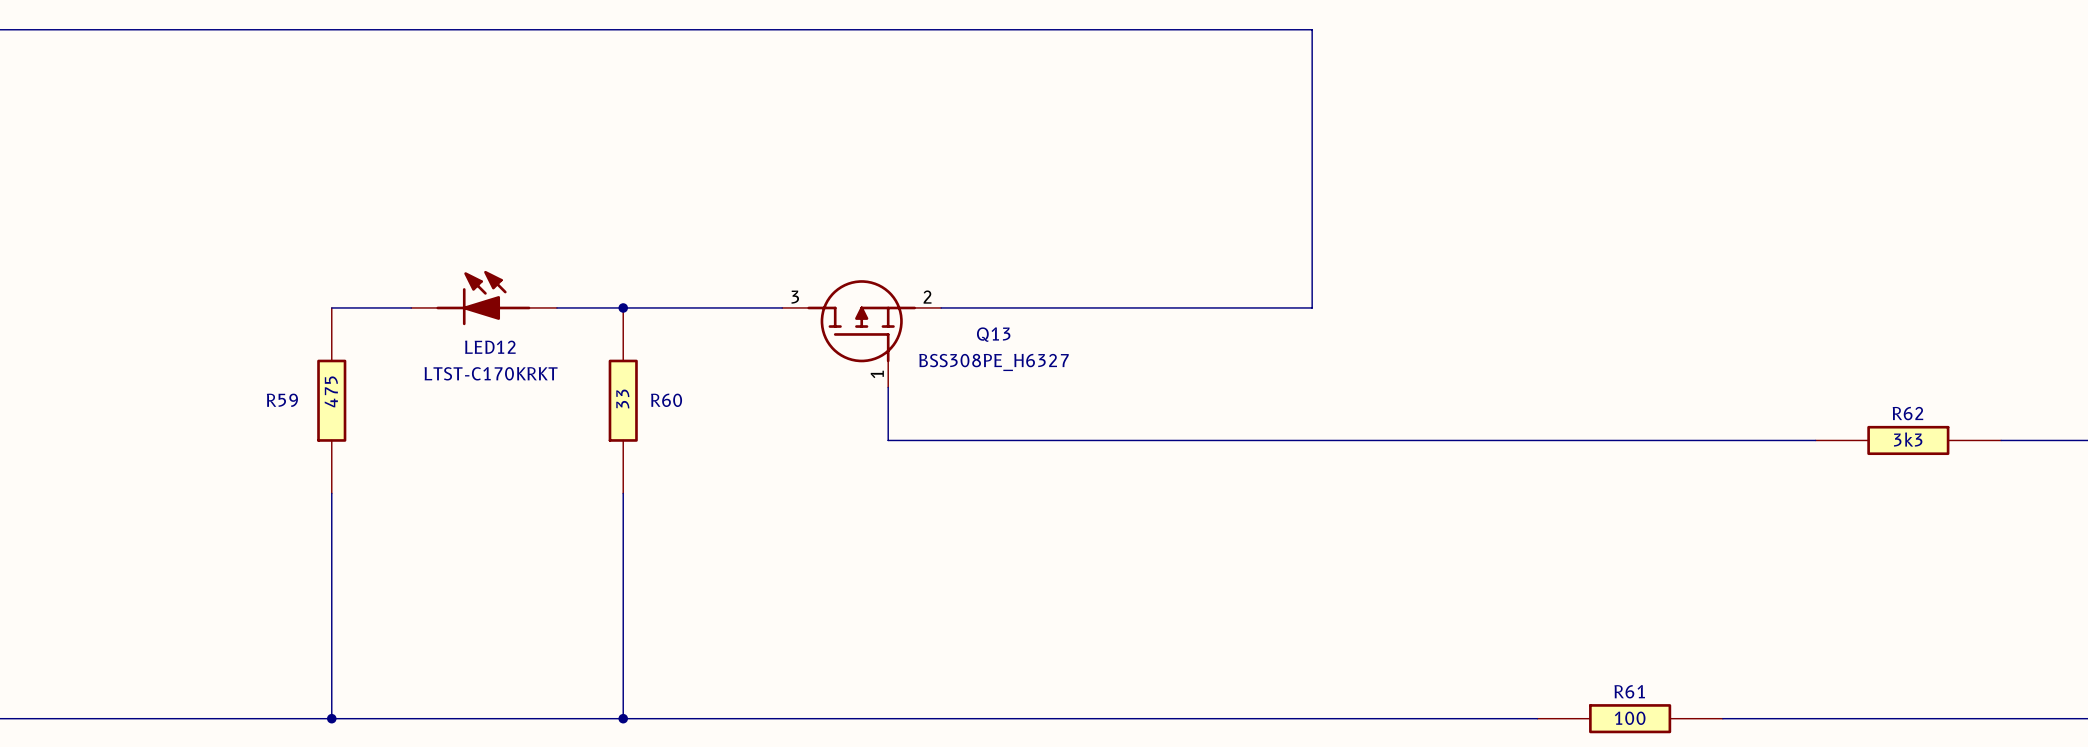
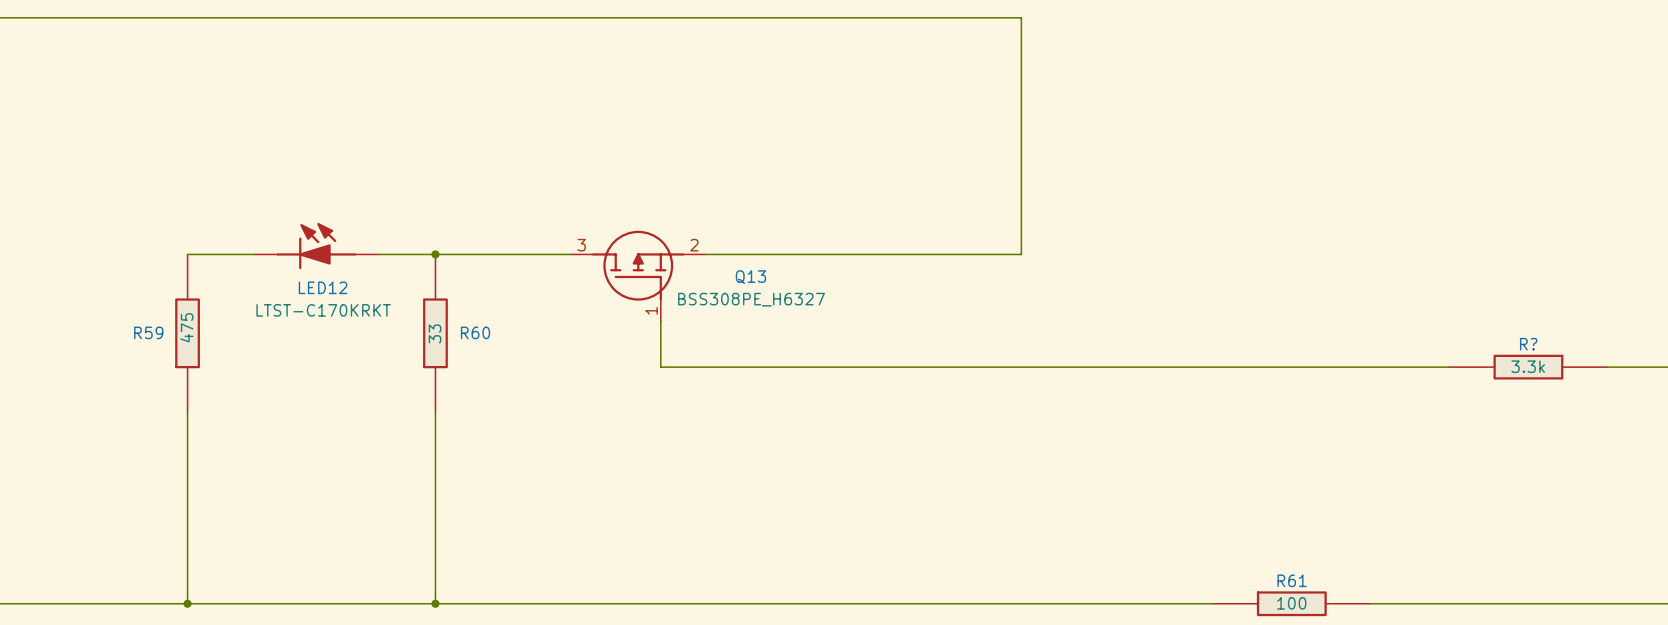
R62 name: R62 (1907, 413) -> R? (1528, 344)
R62 value: 3k3 (1908, 439) -> 3.3k (1528, 366)

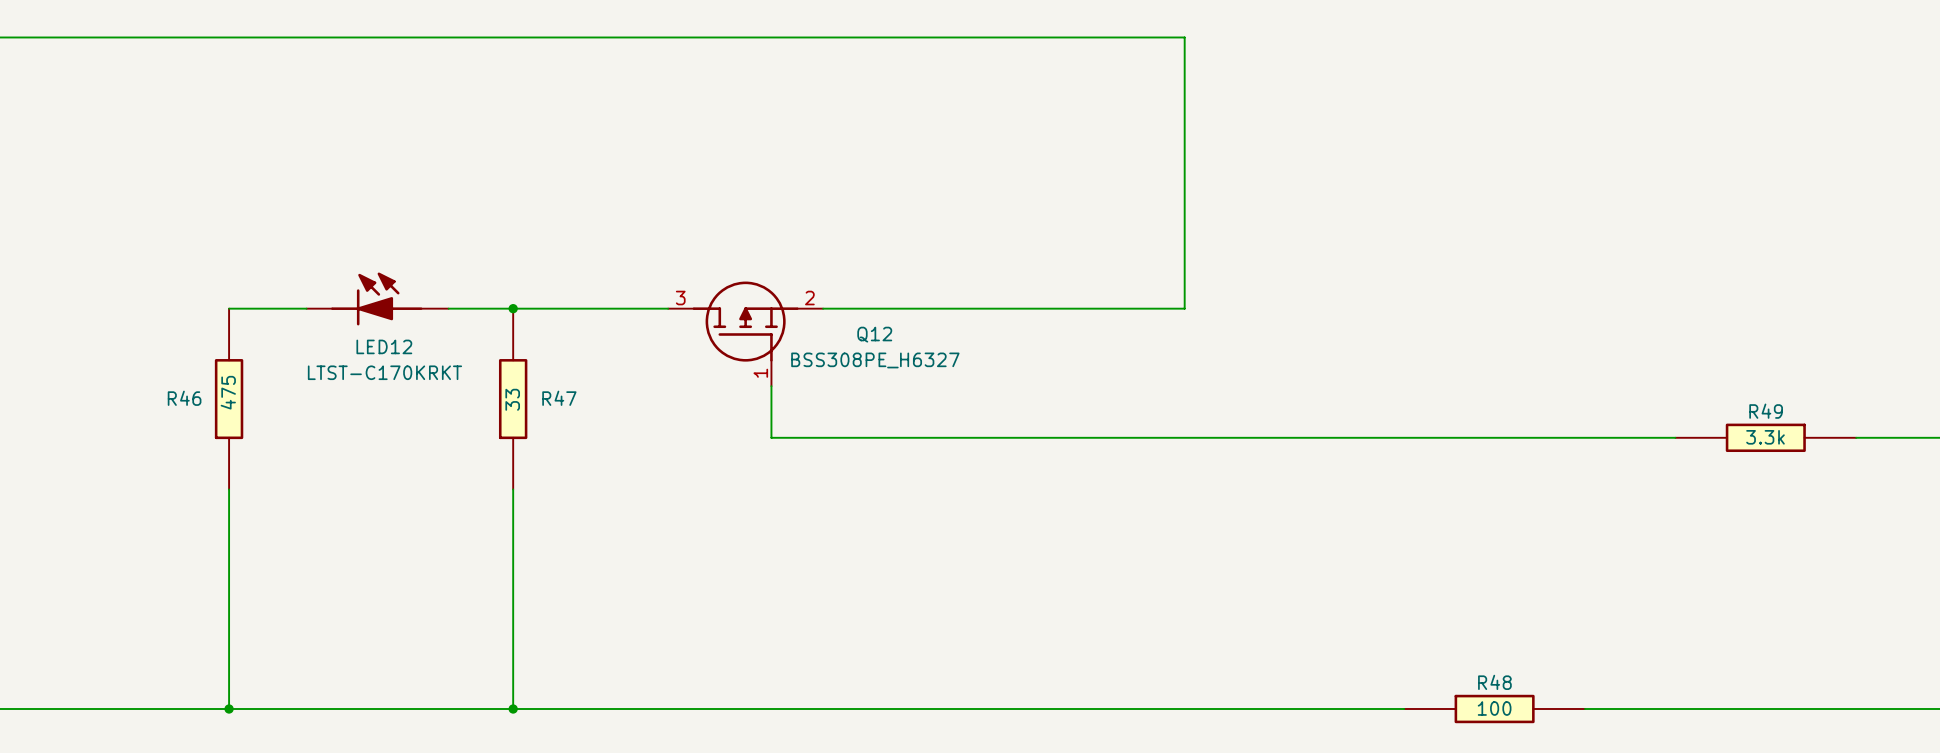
Q13 name: Q13 (750, 277) -> Q12 (874, 334)
R59 name: R59 (148, 332) -> R46 (184, 398)
R60 name: R60 (475, 332) -> R47 (559, 398)
R? name: R? (1528, 344) -> R49 (1766, 411)
R61 name: R61 (1292, 580) -> R48 (1494, 682)

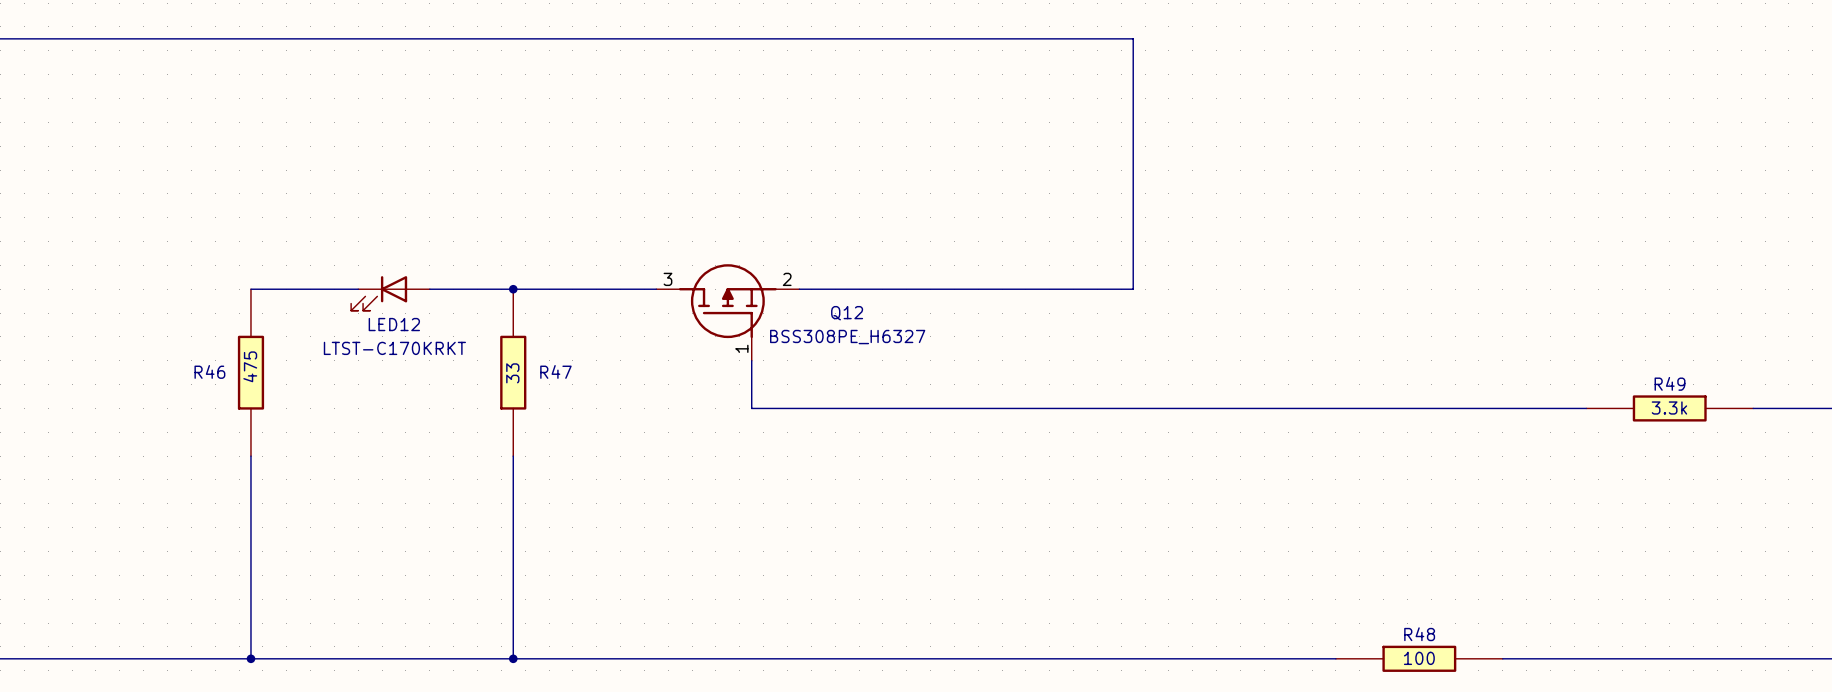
LED12 symbol: [306, 272, 449, 326] -> [351, 276, 430, 311]

